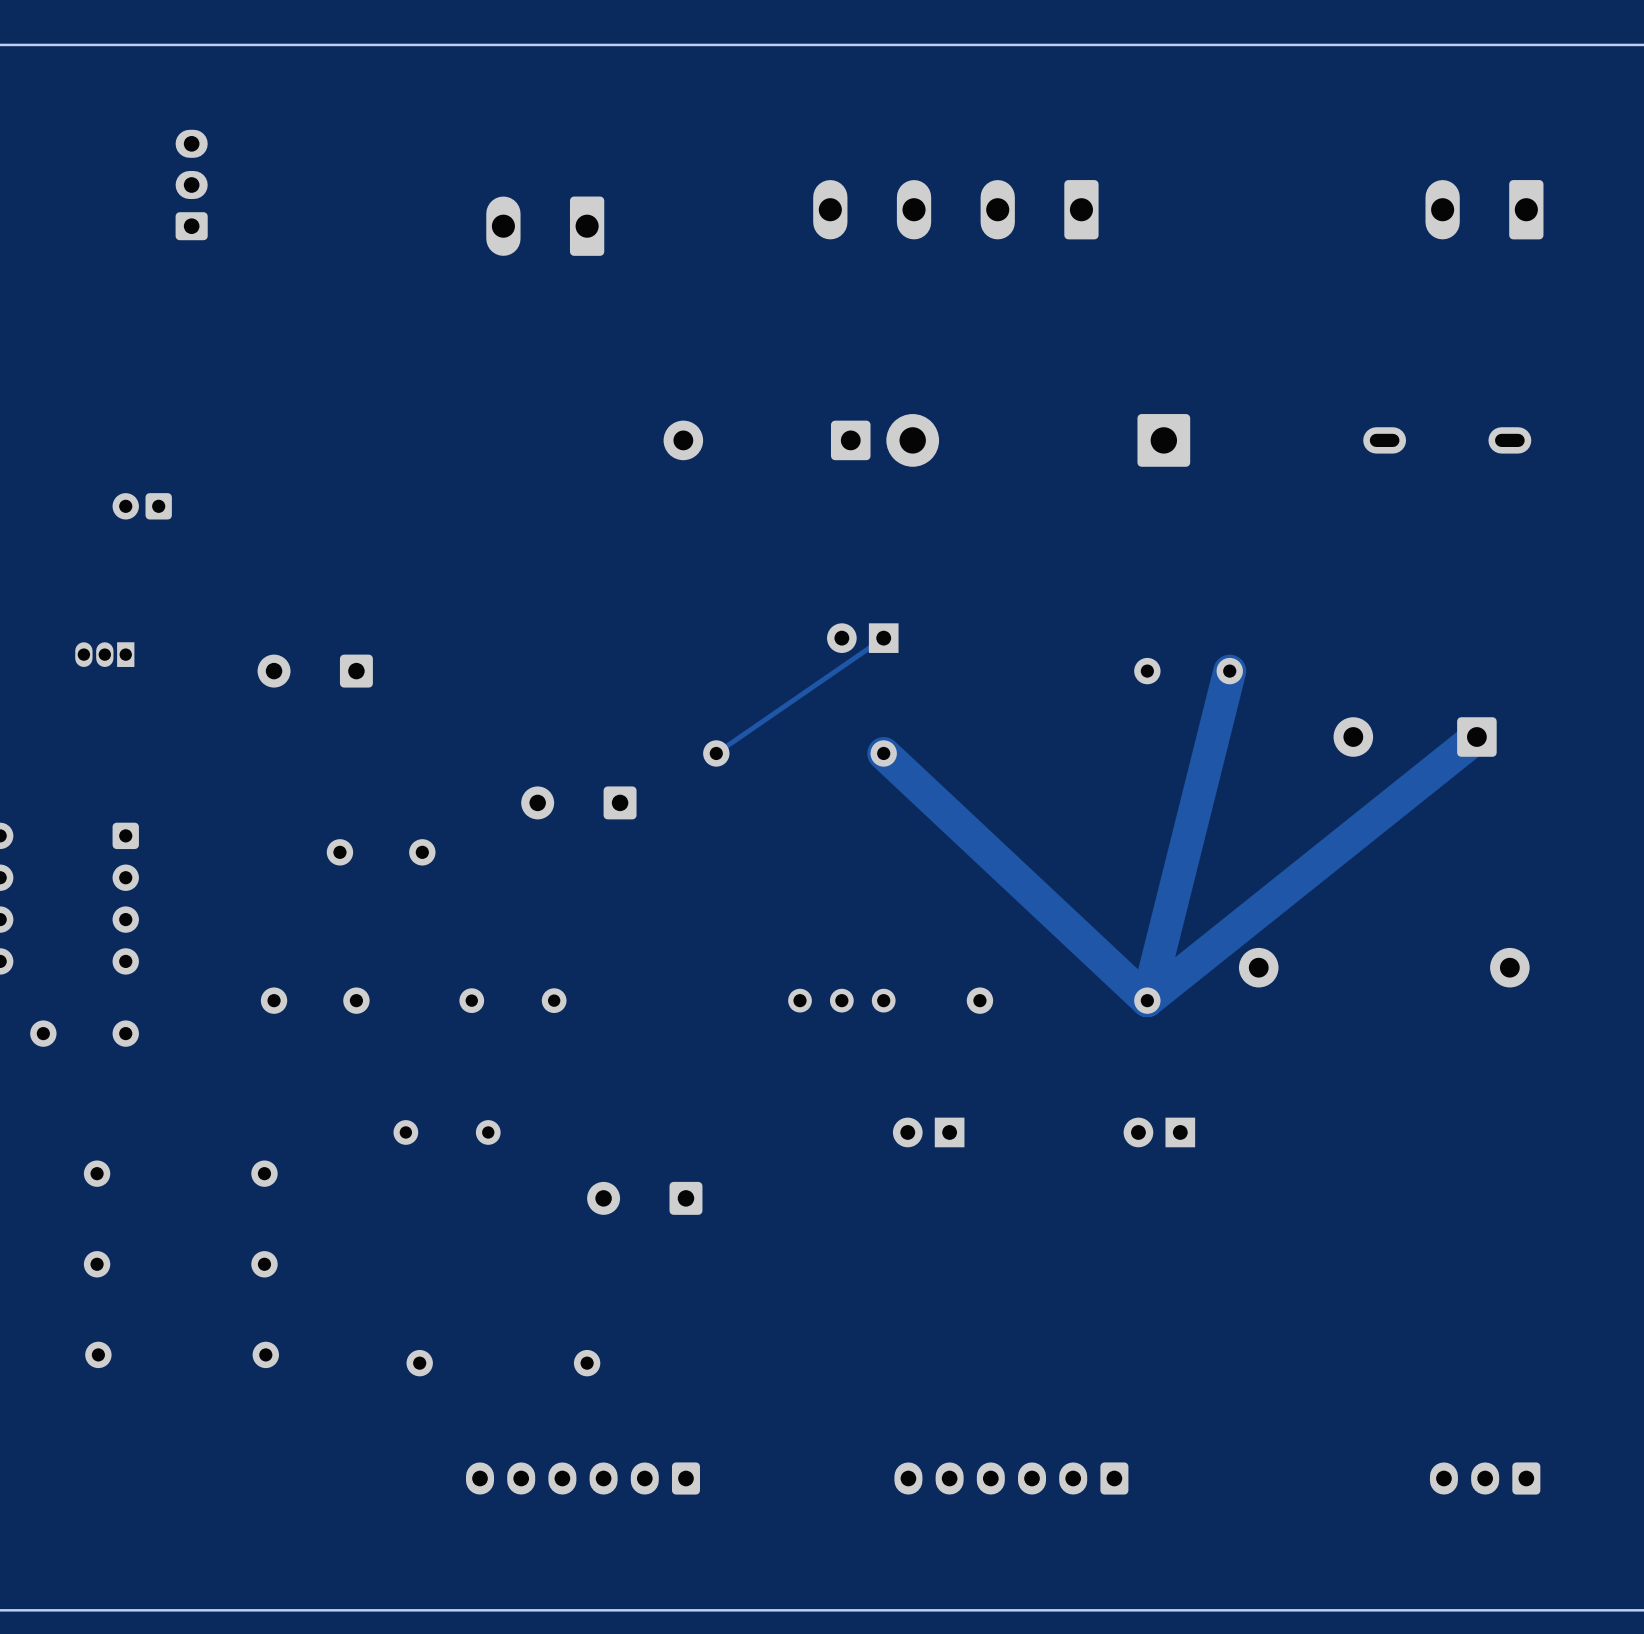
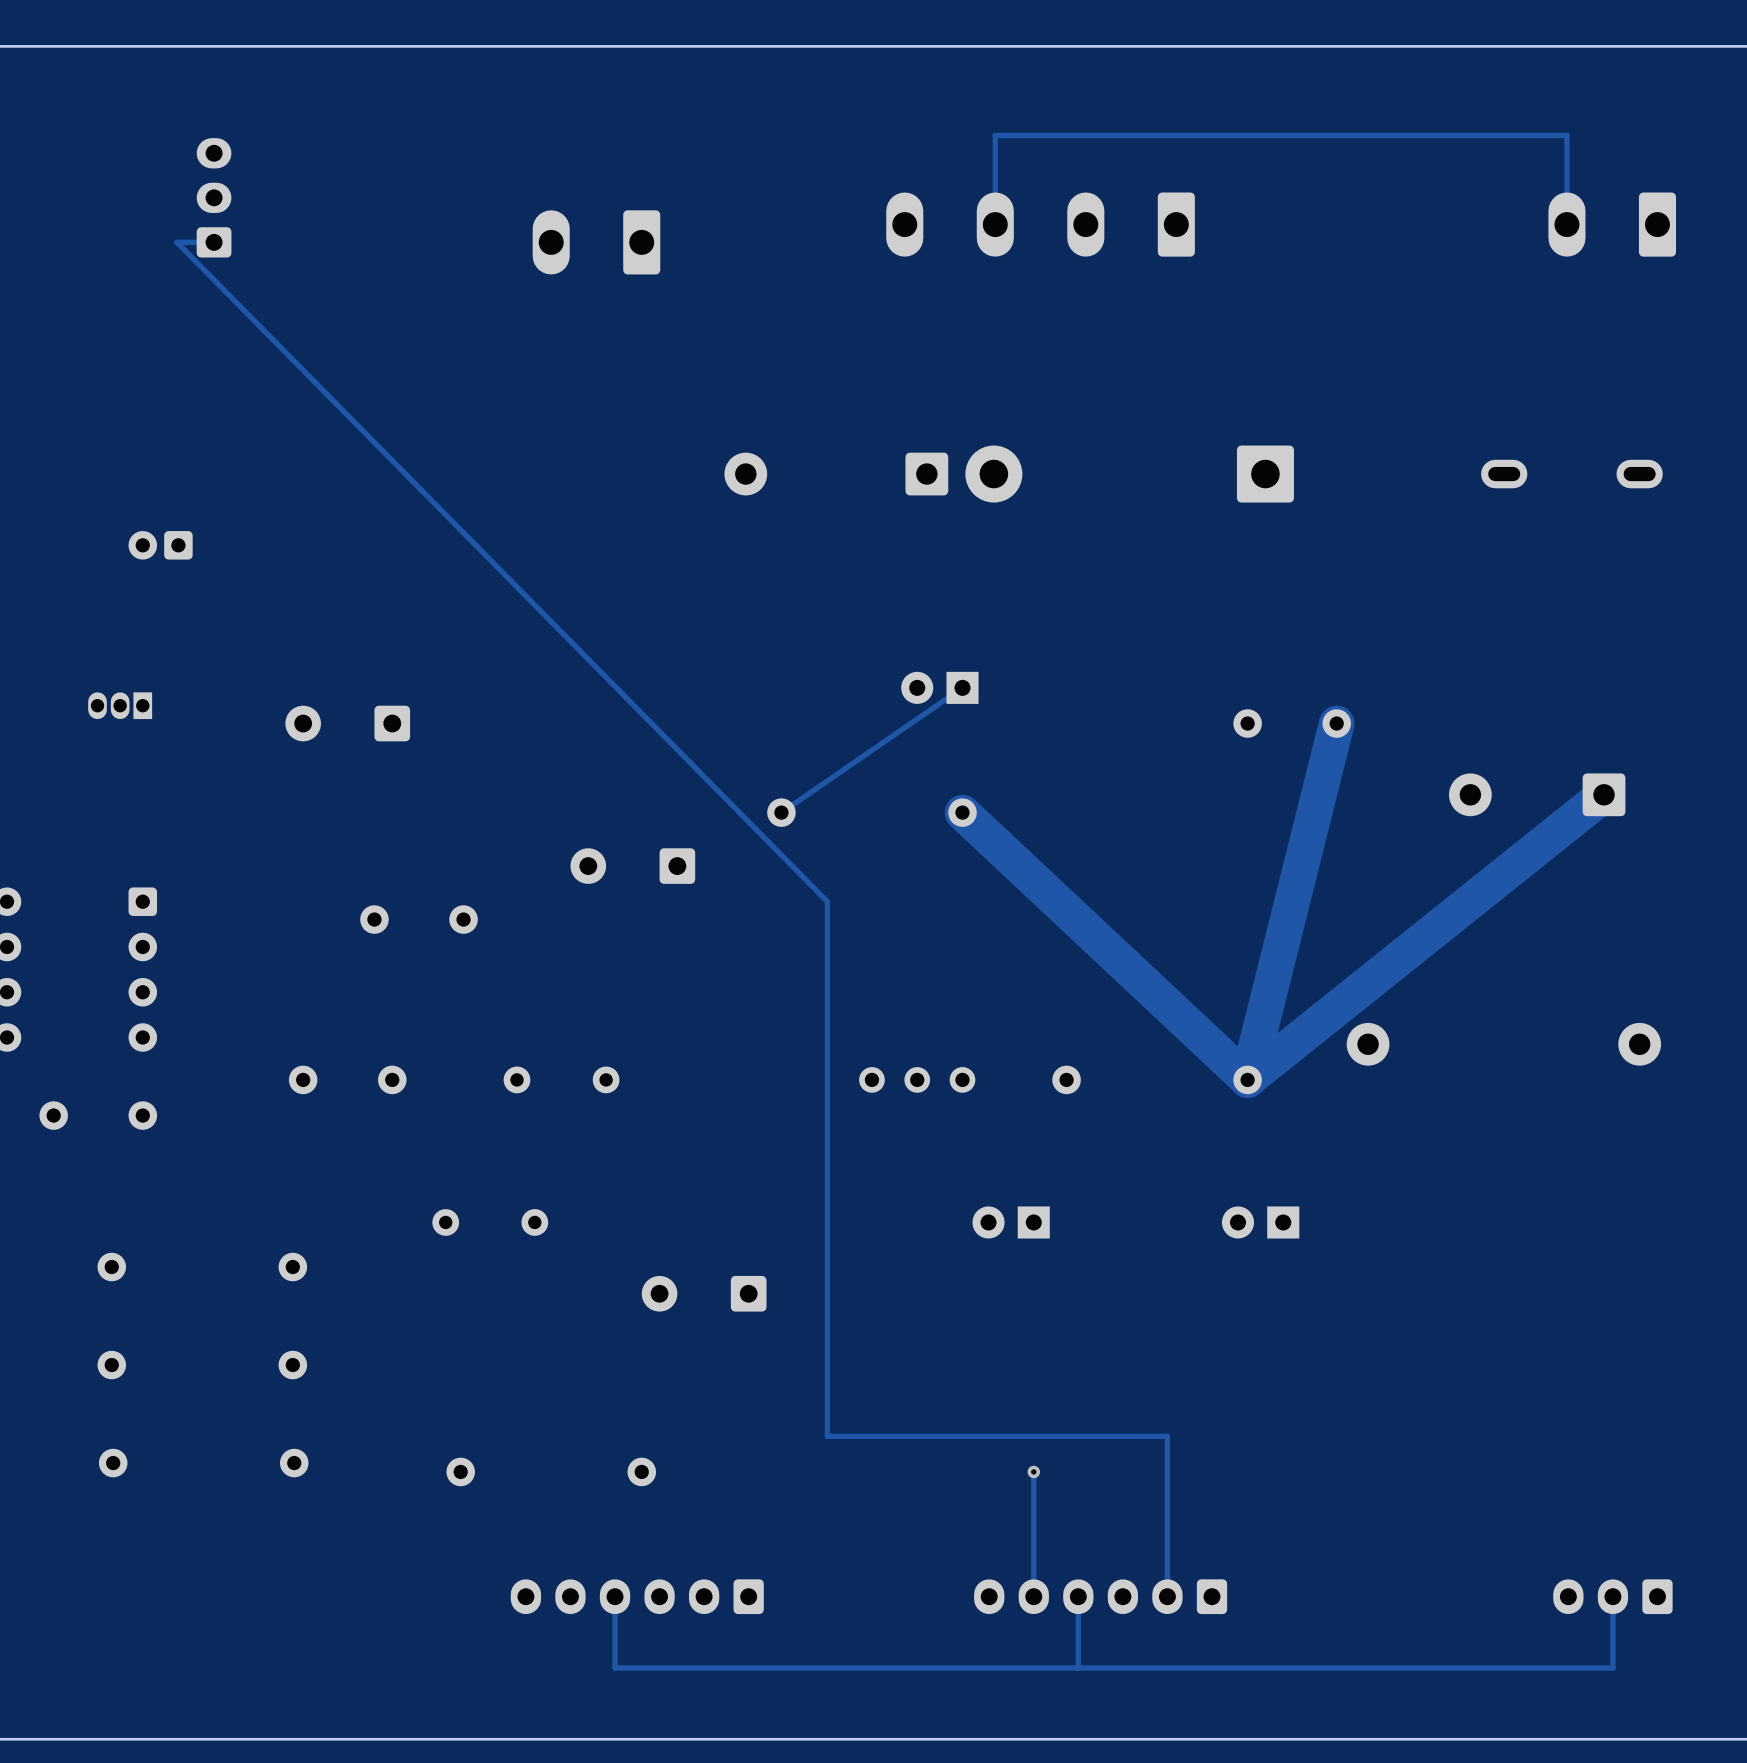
track: none -> (1566, 224) (1566, 135) (995, 135) (995, 224)
track: none -> (214, 242) (177, 242) (827, 901) (827, 1436) (1167, 1436) (1167, 1596)
track: none -> (1033, 1471) (1033, 1596)
via: none -> (1033, 1471)
track: none -> (1078, 1596) (1078, 1667)
track: none -> (1612, 1596) (1612, 1667) (615, 1667) (615, 1596)

